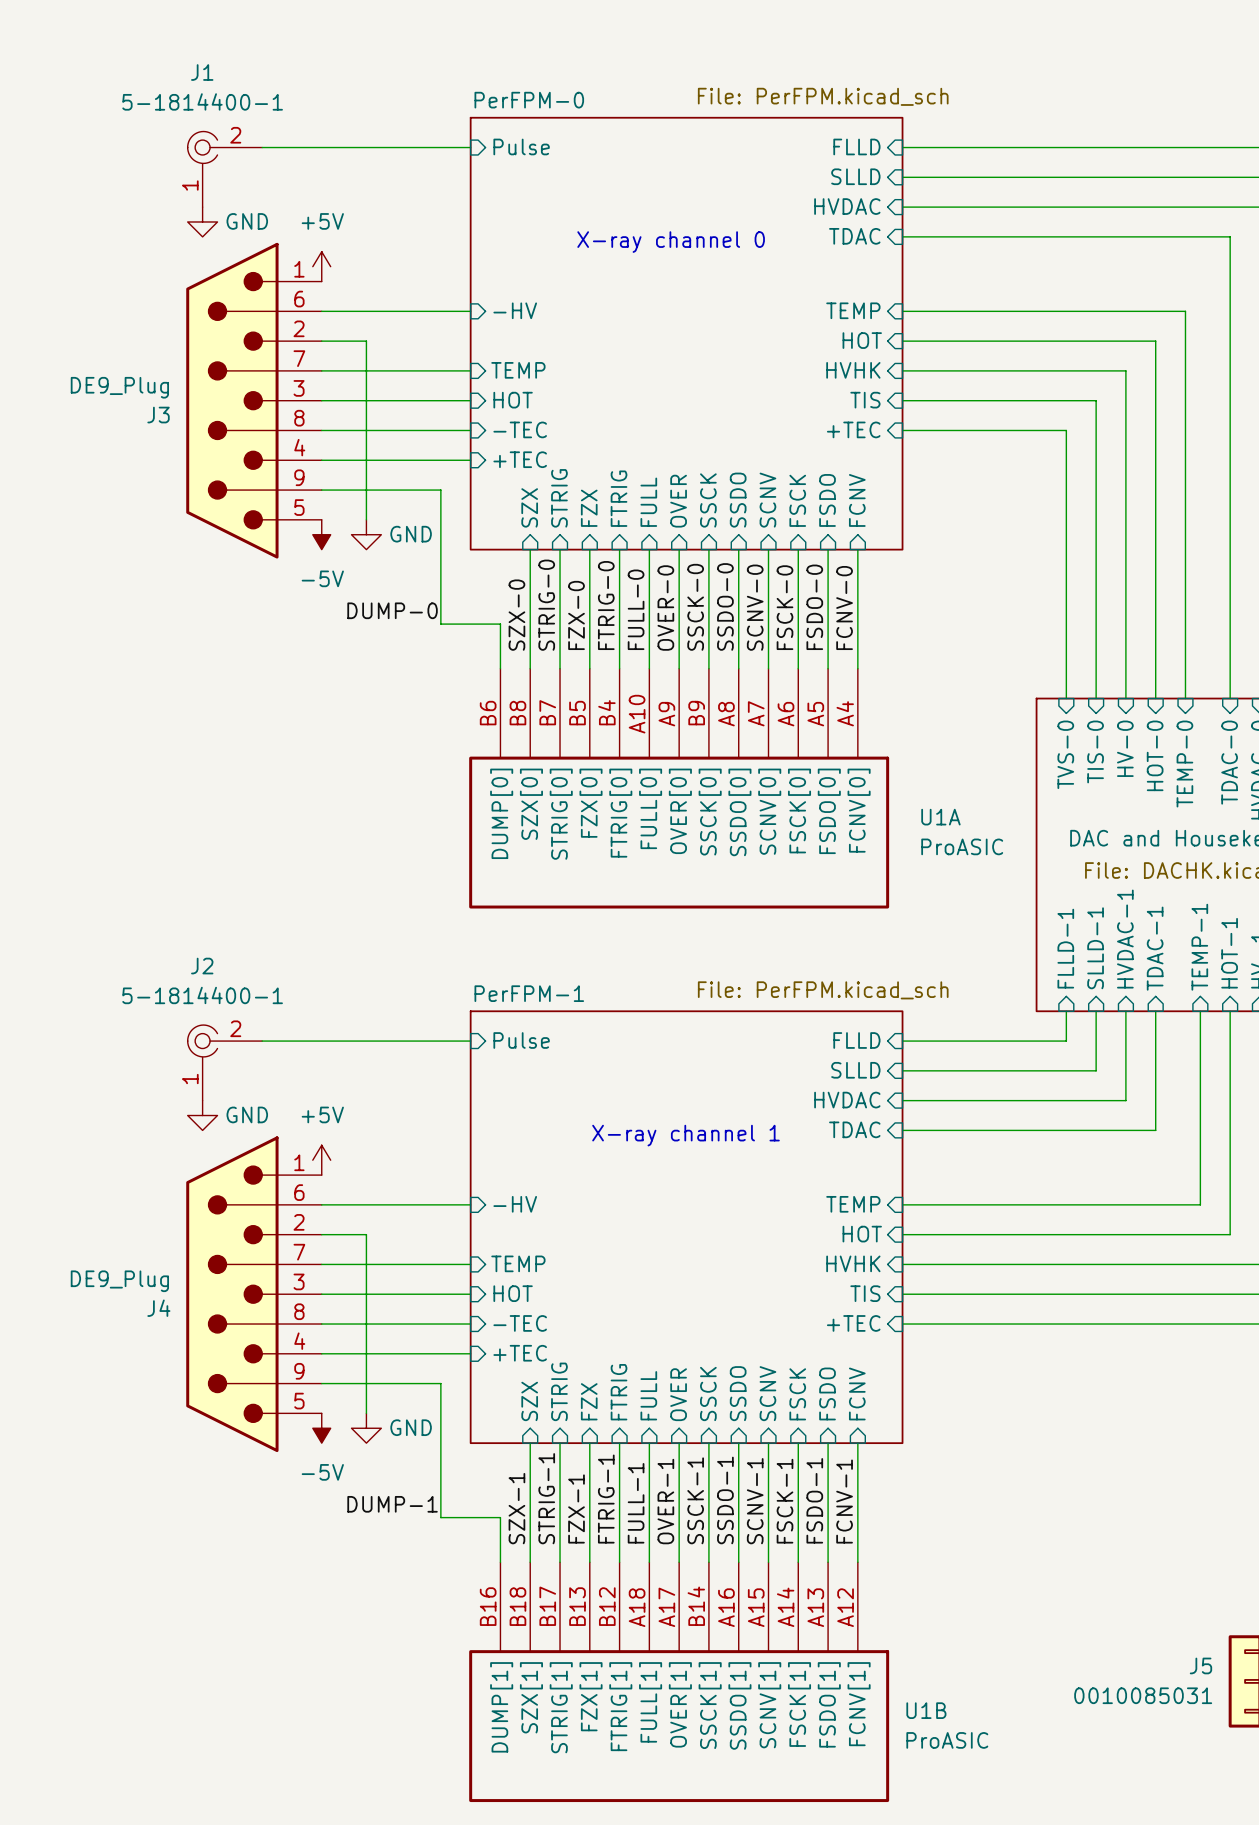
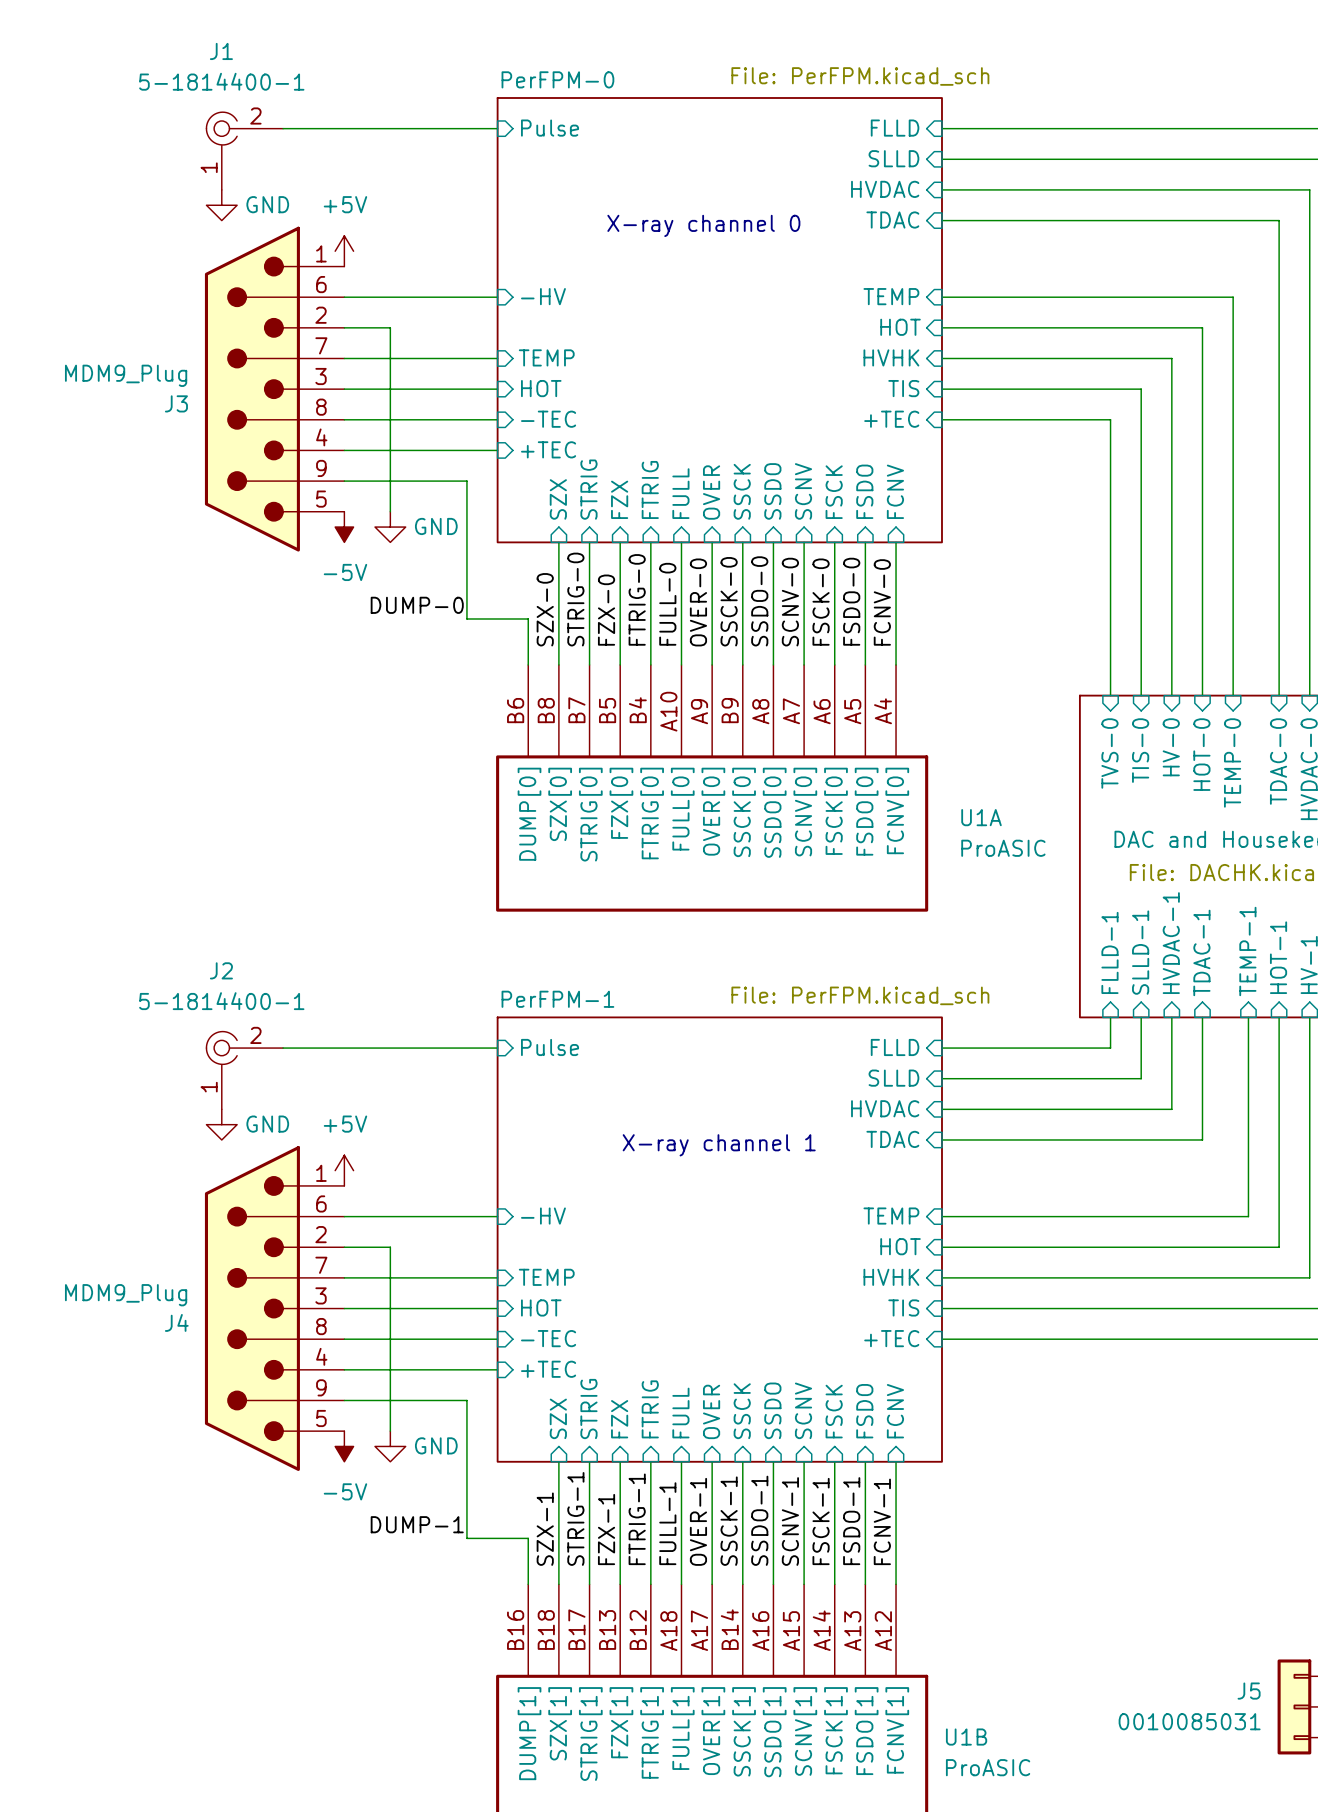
J3 value: DE9_Plug (119, 387) -> MDM9_Plug (126, 375)
J4 value: DE9_Plug (119, 1281) -> MDM9_Plug (126, 1295)

